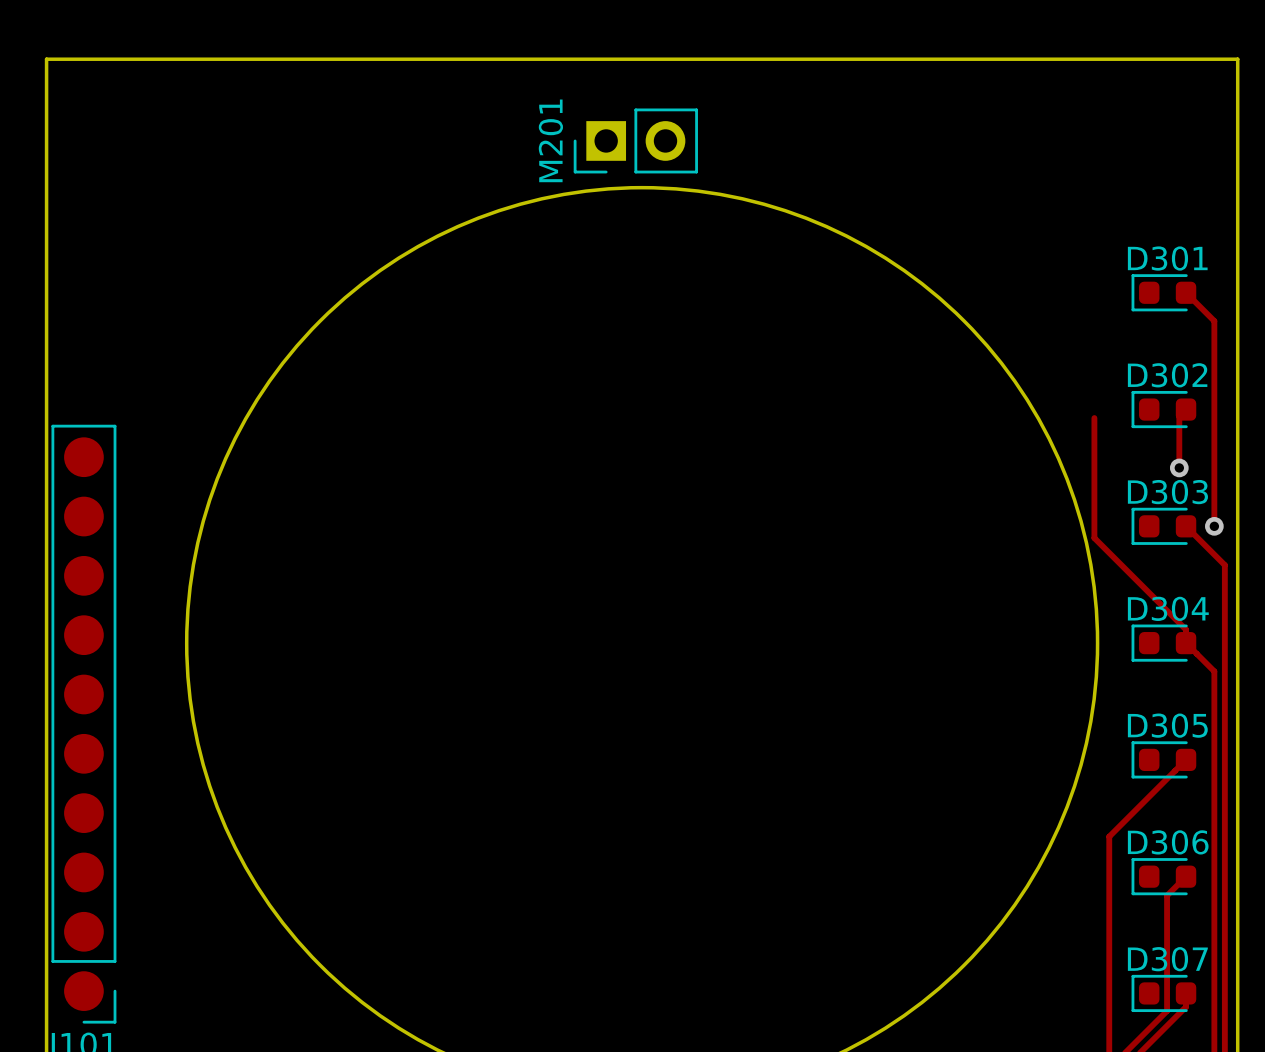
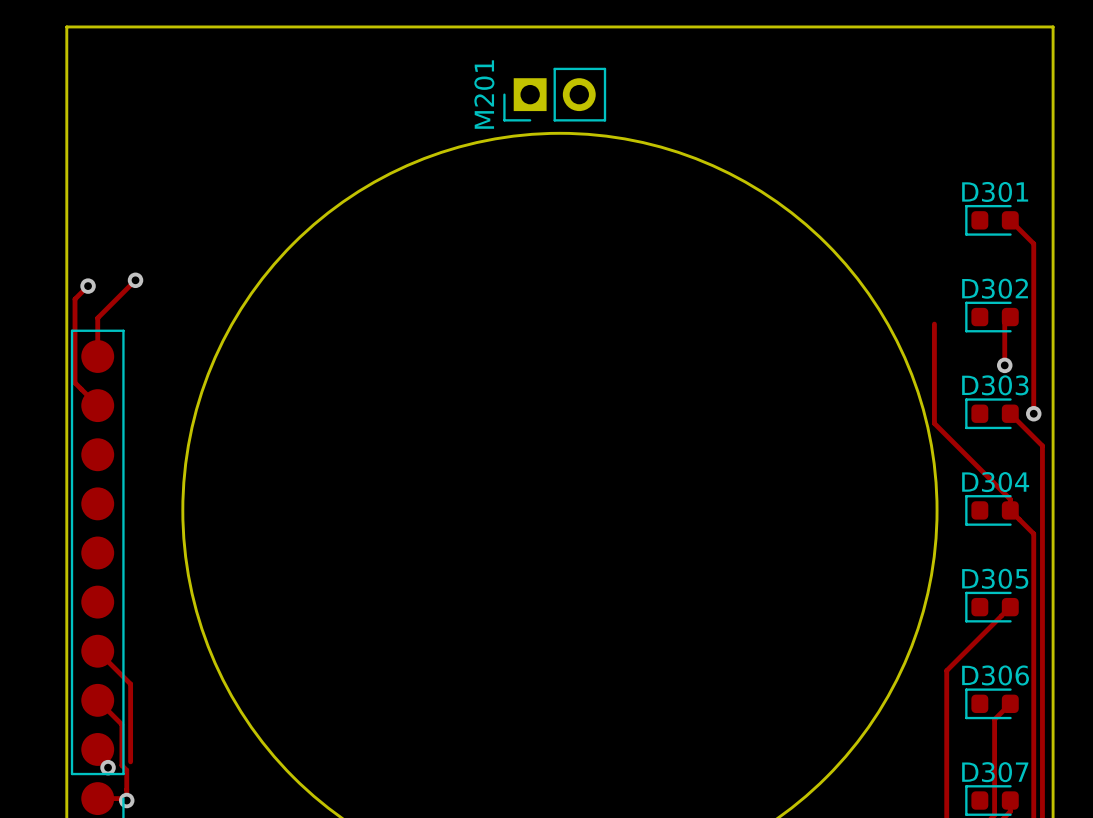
track: none -> (135, 280) (97, 318) (97, 356)
via: none -> (135, 280)
track: none -> (88, 286) (75, 299) (75, 382) (97, 405)
via: none -> (88, 286)
track: none -> (97, 651) (130, 684) (130, 761)
track: none -> (97, 700) (121, 724) (121, 765) (126, 770) (126, 800) (124, 798) (97, 798)
via: none -> (108, 767)
via: none -> (126, 800)

